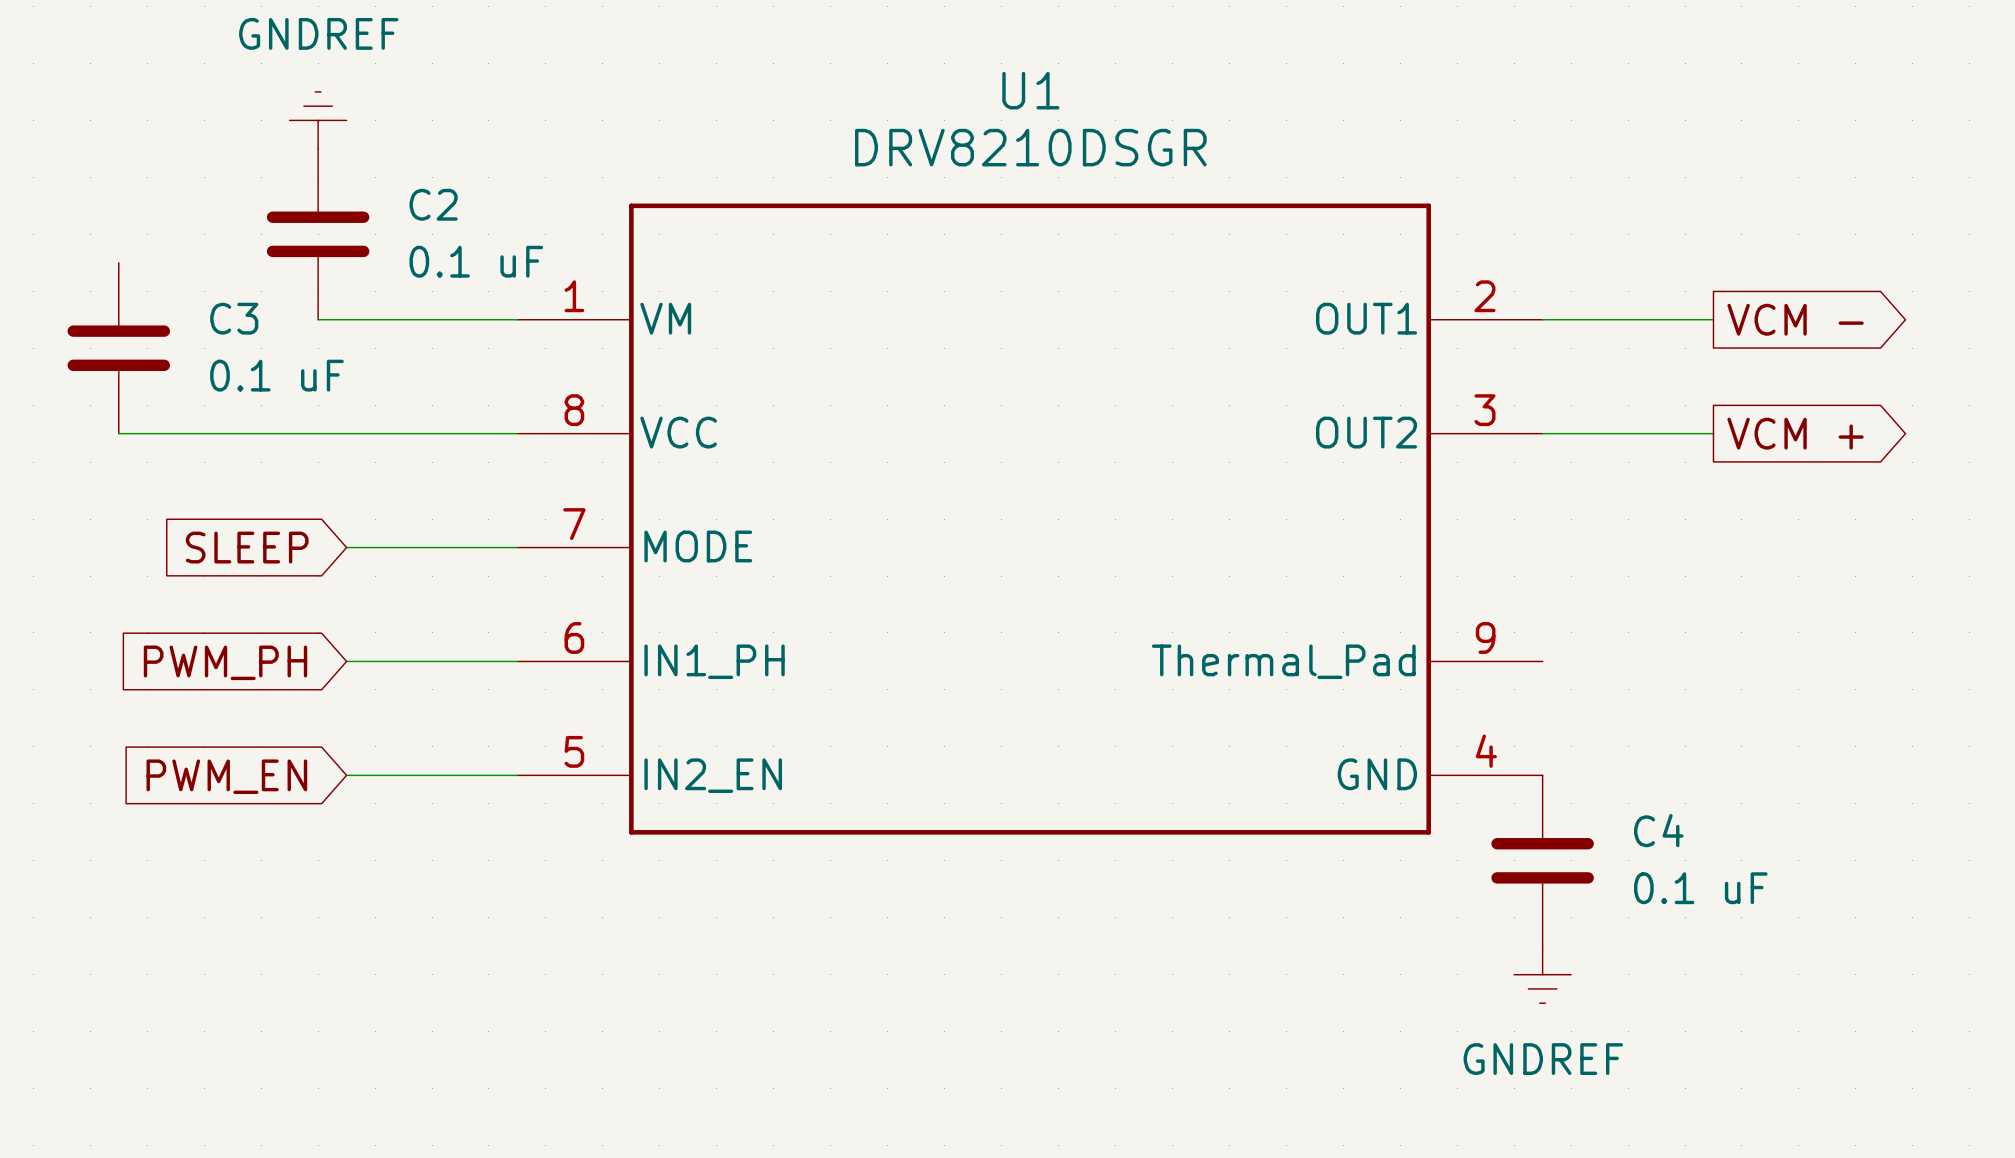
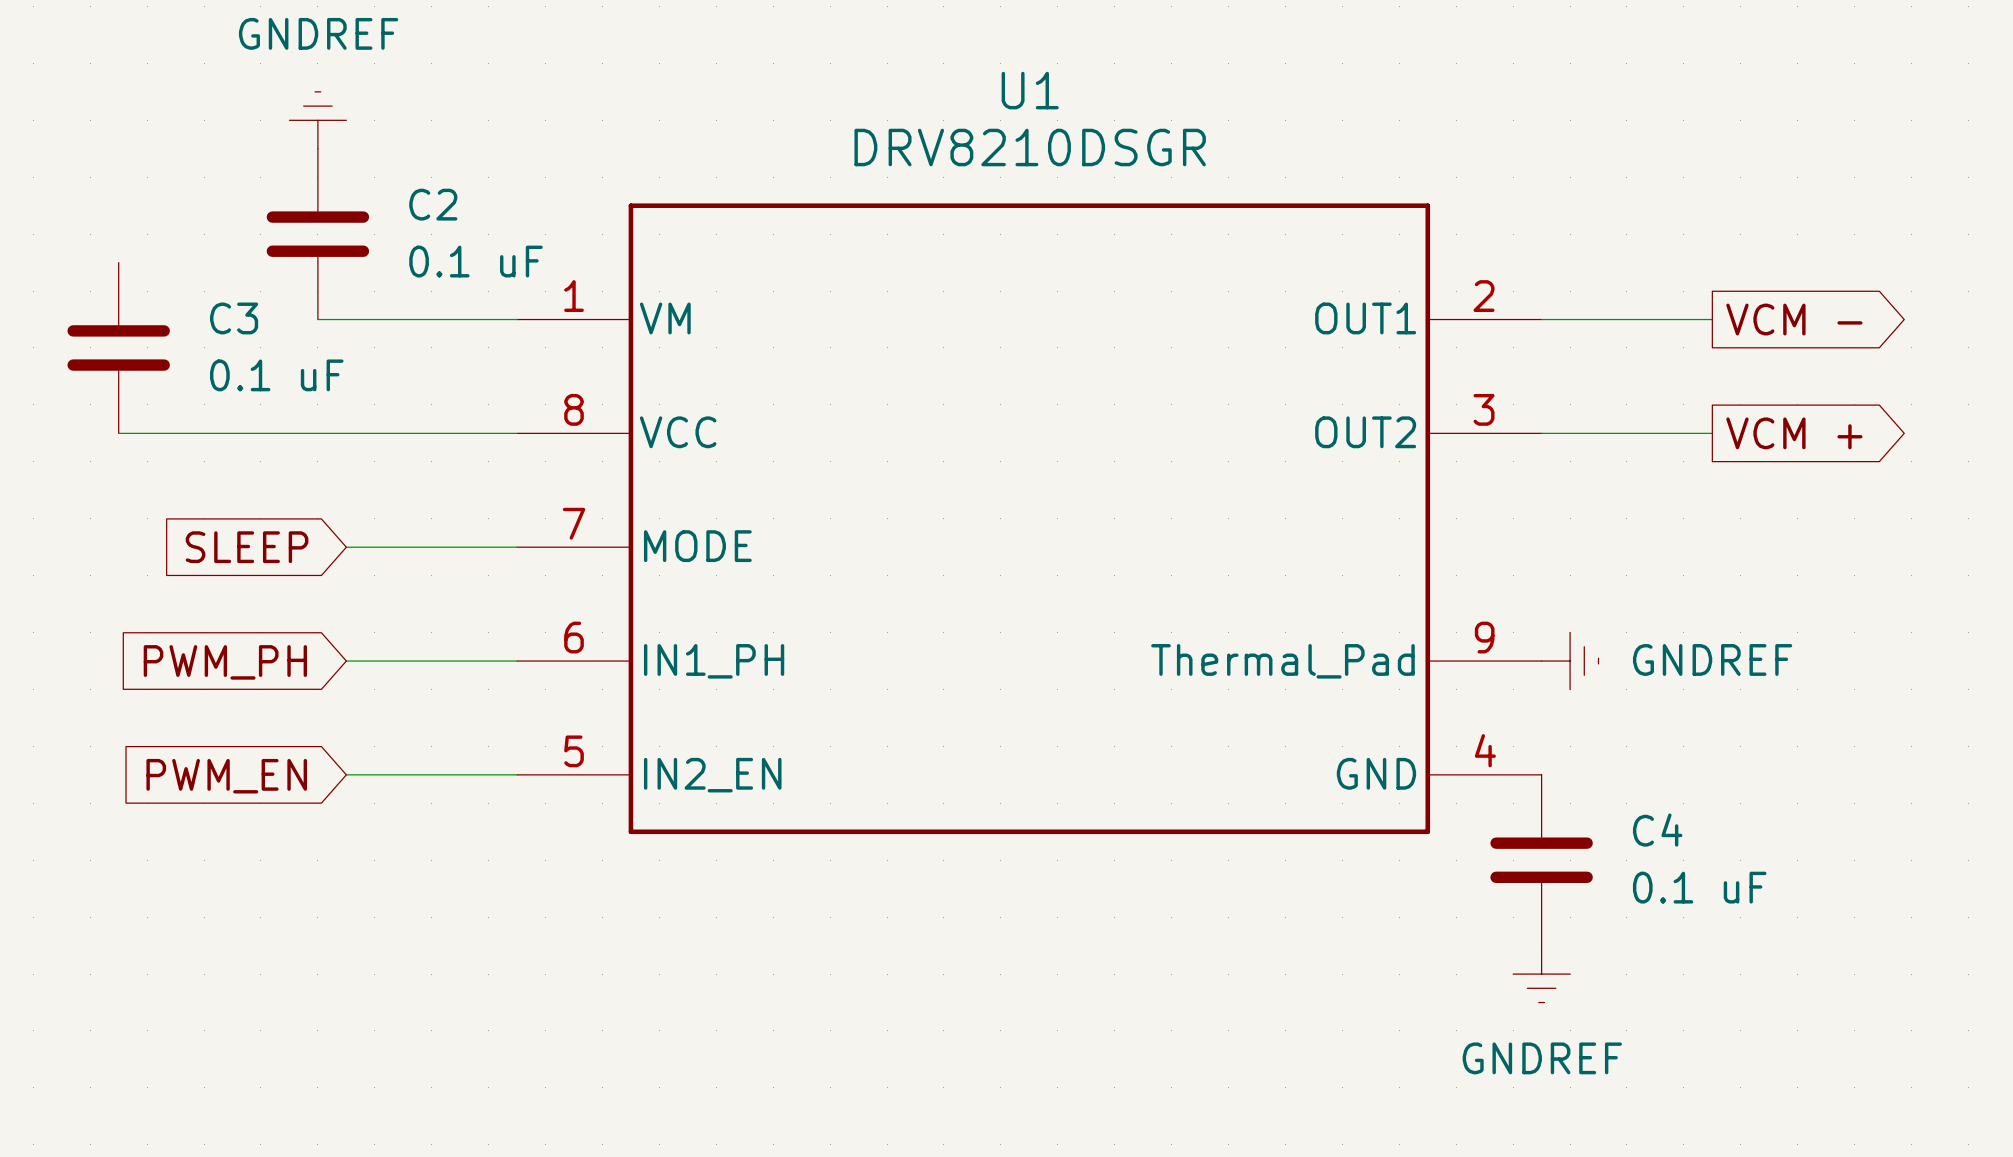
power symbol: none -> GNDREF (1570, 661)

